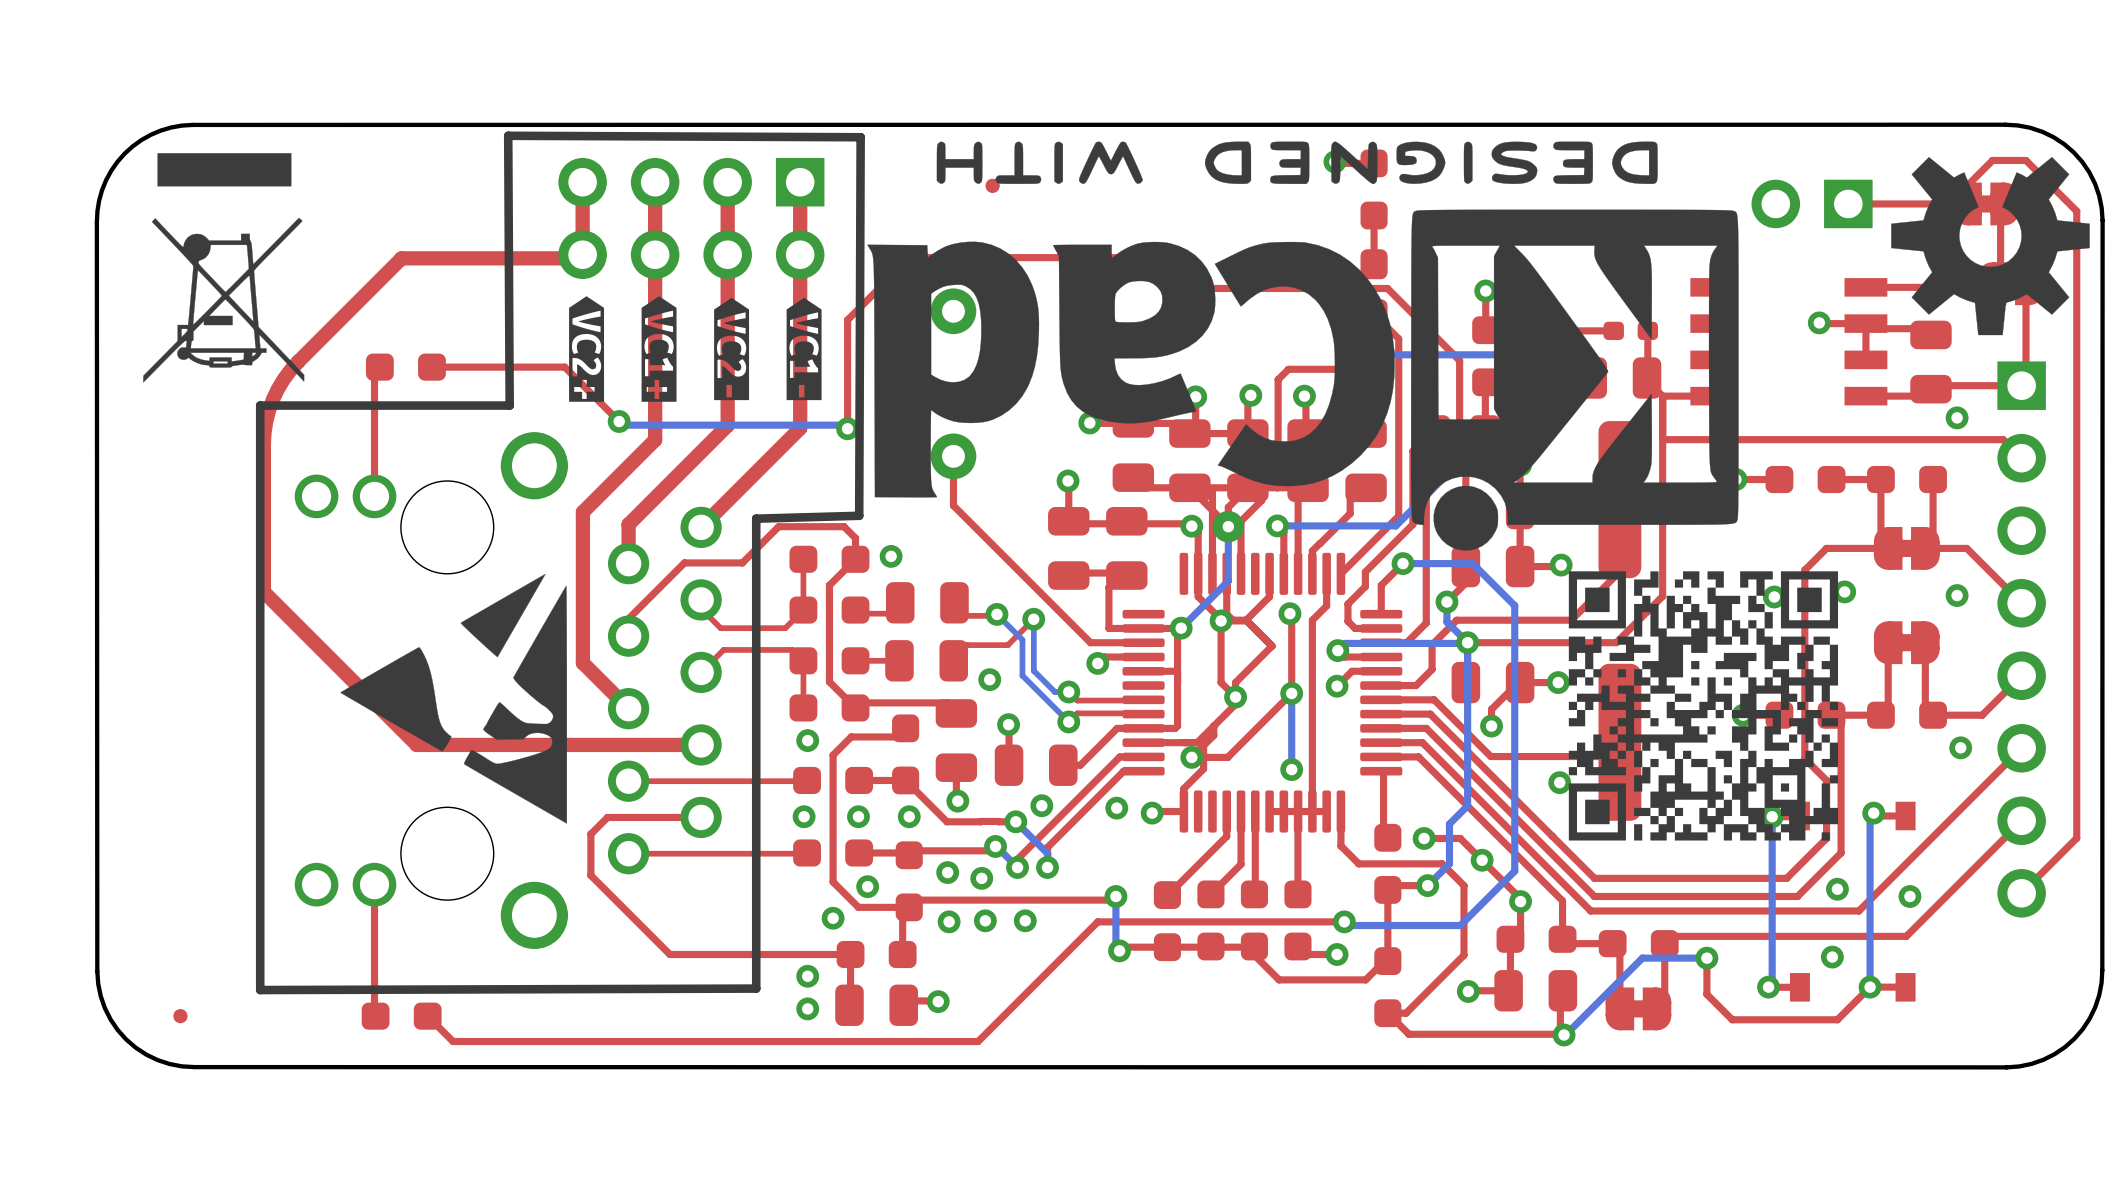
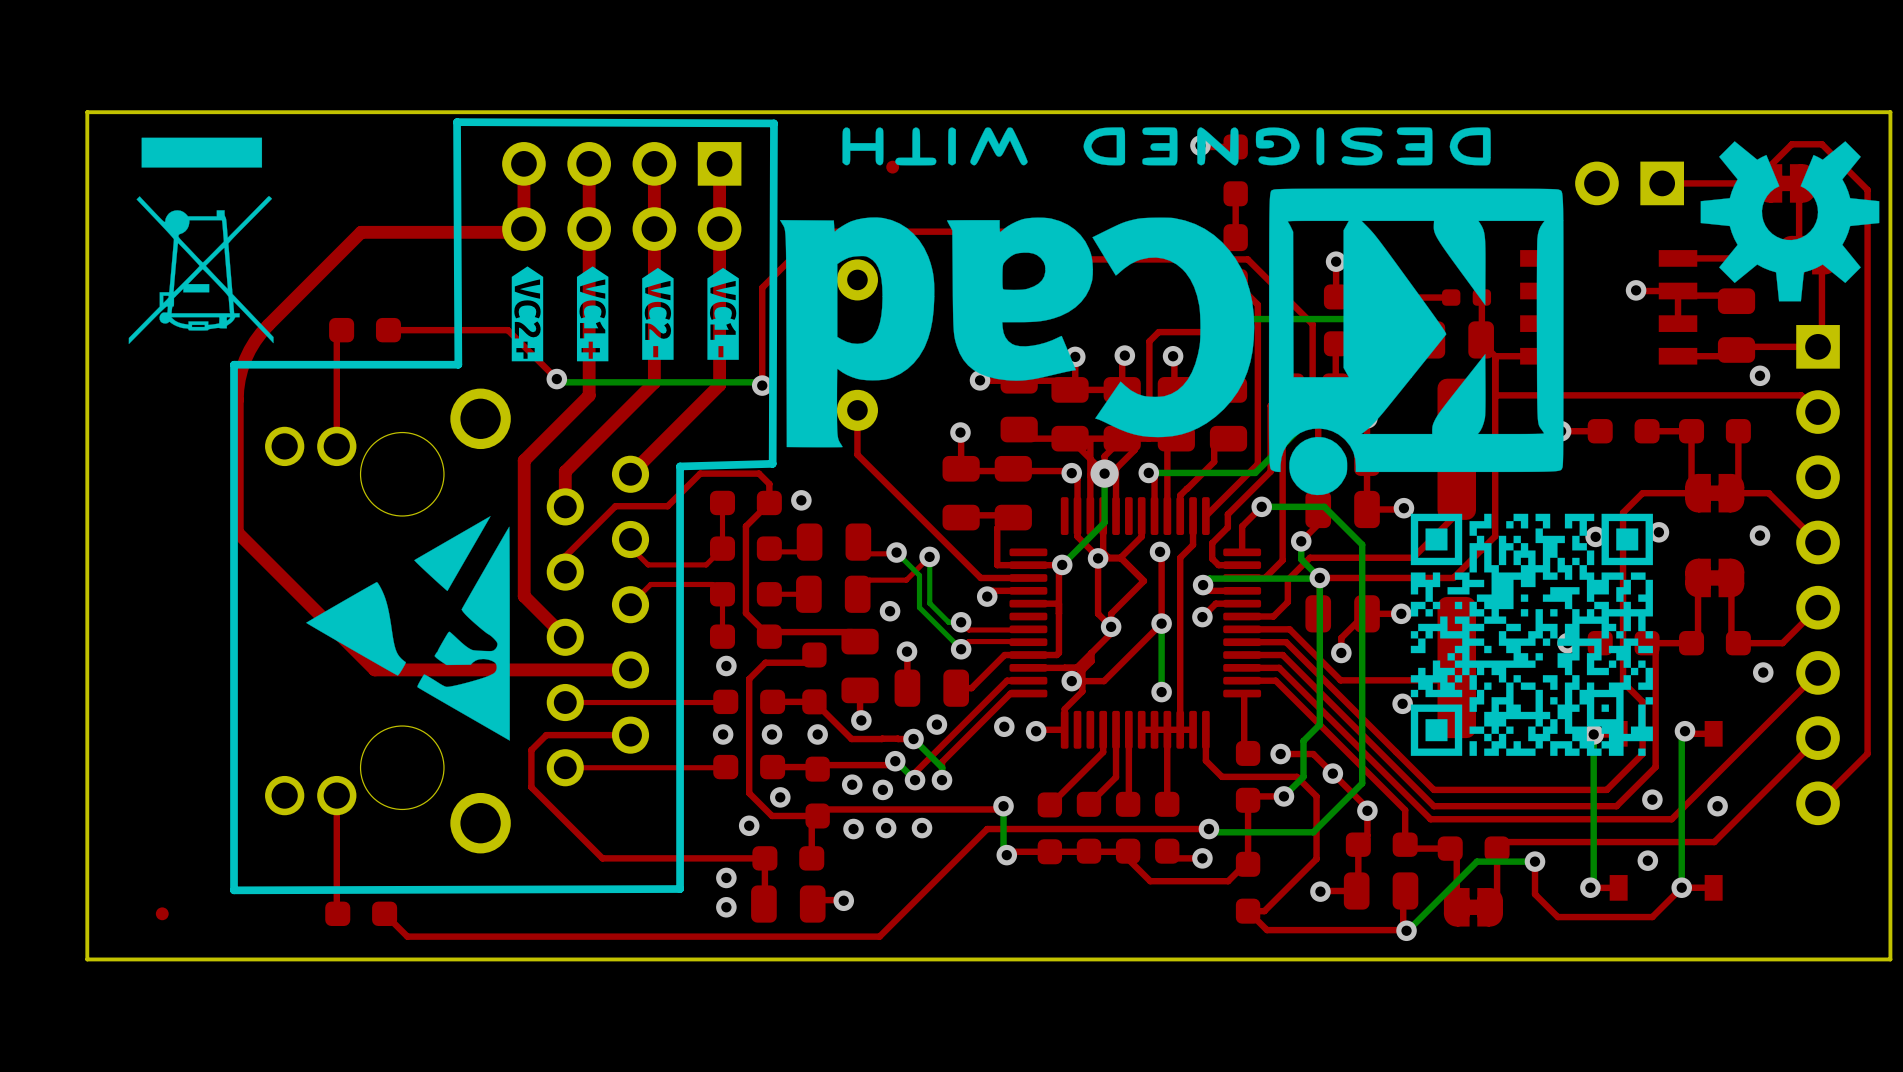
board edge: (2005, 124) (192, 124) (171, 127) (150, 134) (132, 146) (117, 161) (106, 180) (97, 211) (97, 971) (98, 983) (104, 1008) (117, 1029) (135, 1047) (146, 1054) (169, 1063) (194, 1067) (2006, 1067) (2031, 1063) (2043, 1059) (2065, 1047) (2082, 1029) (2095, 1007) (2101, 982) (2102, 220) (2101, 207) (2094, 183) (2082, 161) (2073, 152) (2053, 137) (2042, 131) (2030, 127) (2005, 124) -> (1890, 112) (1890, 959) (87, 959) (87, 112) (1890, 112)

